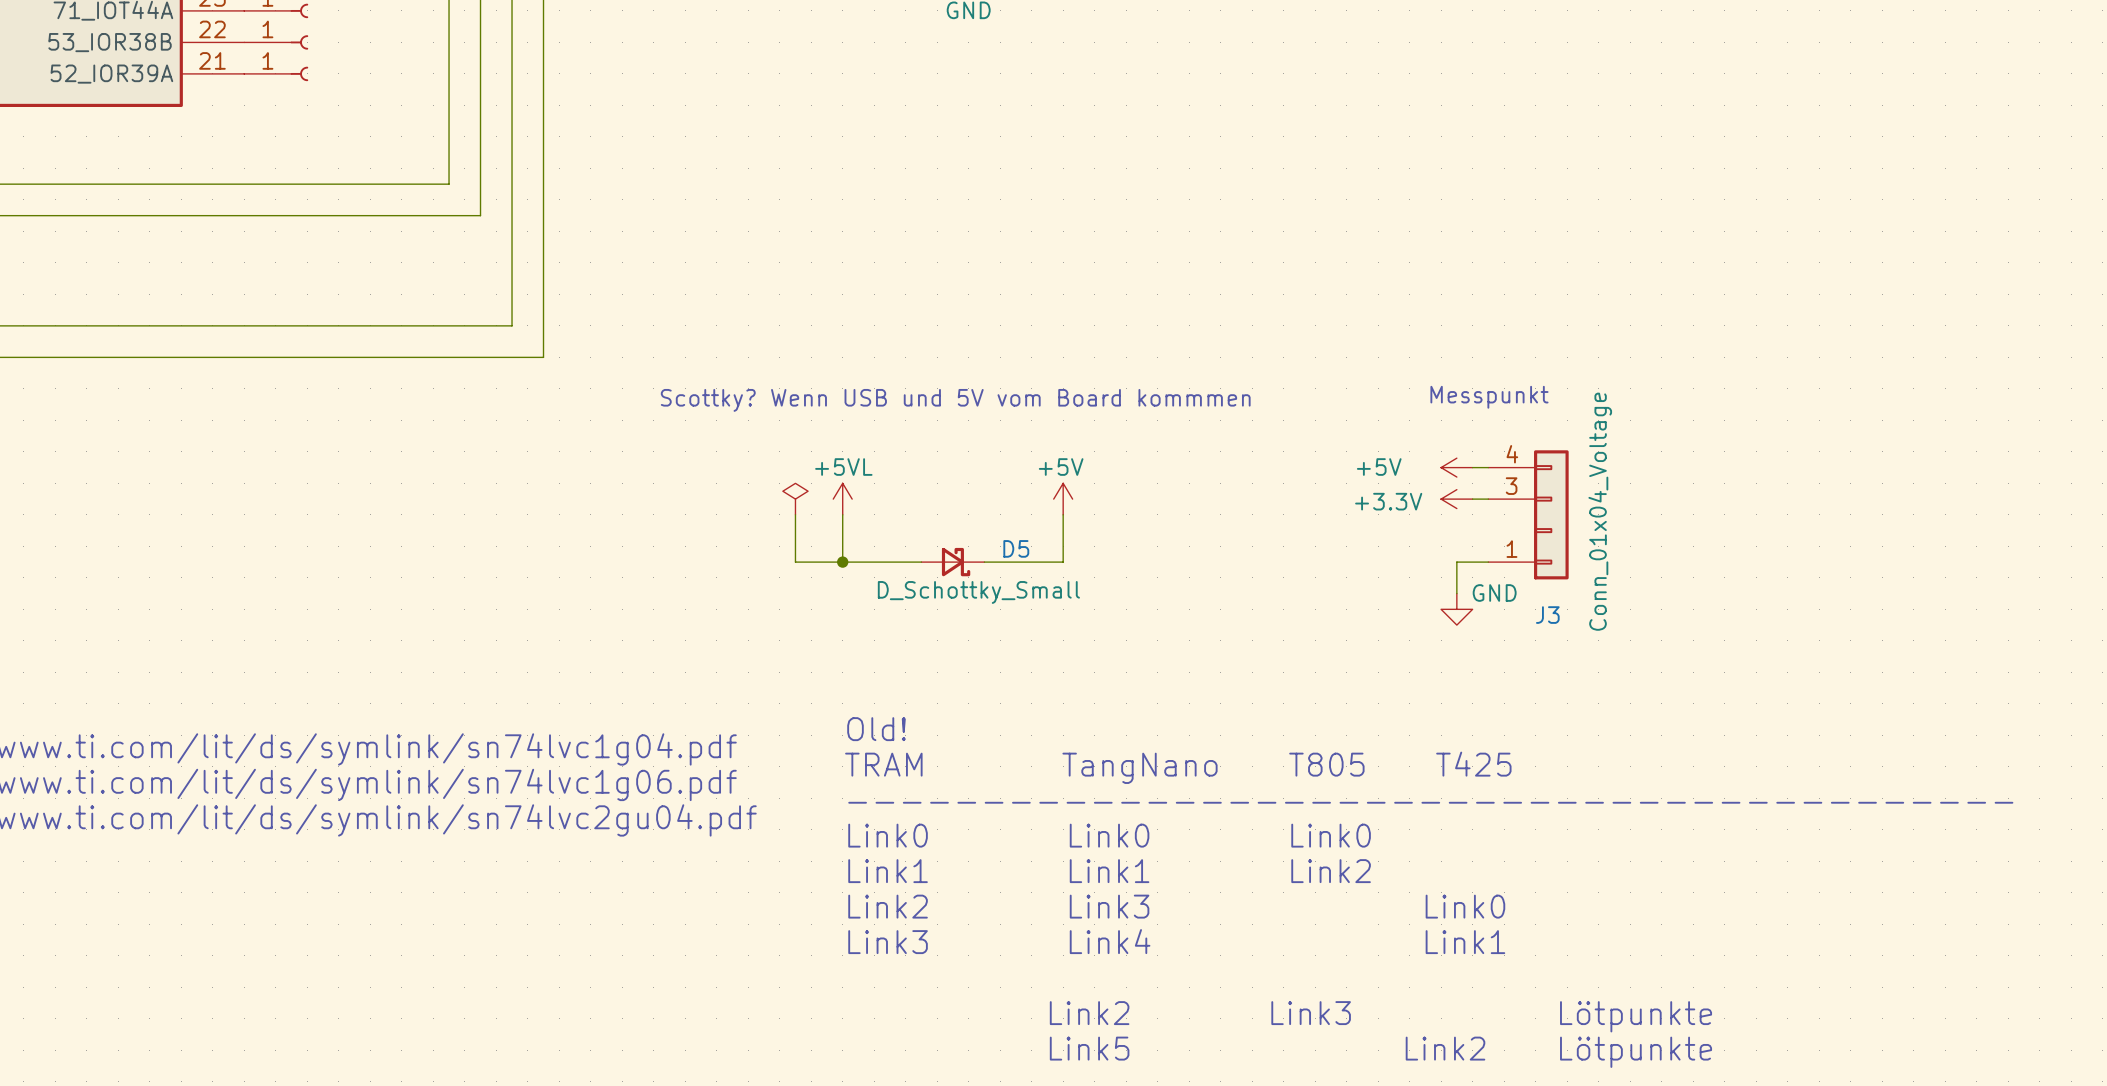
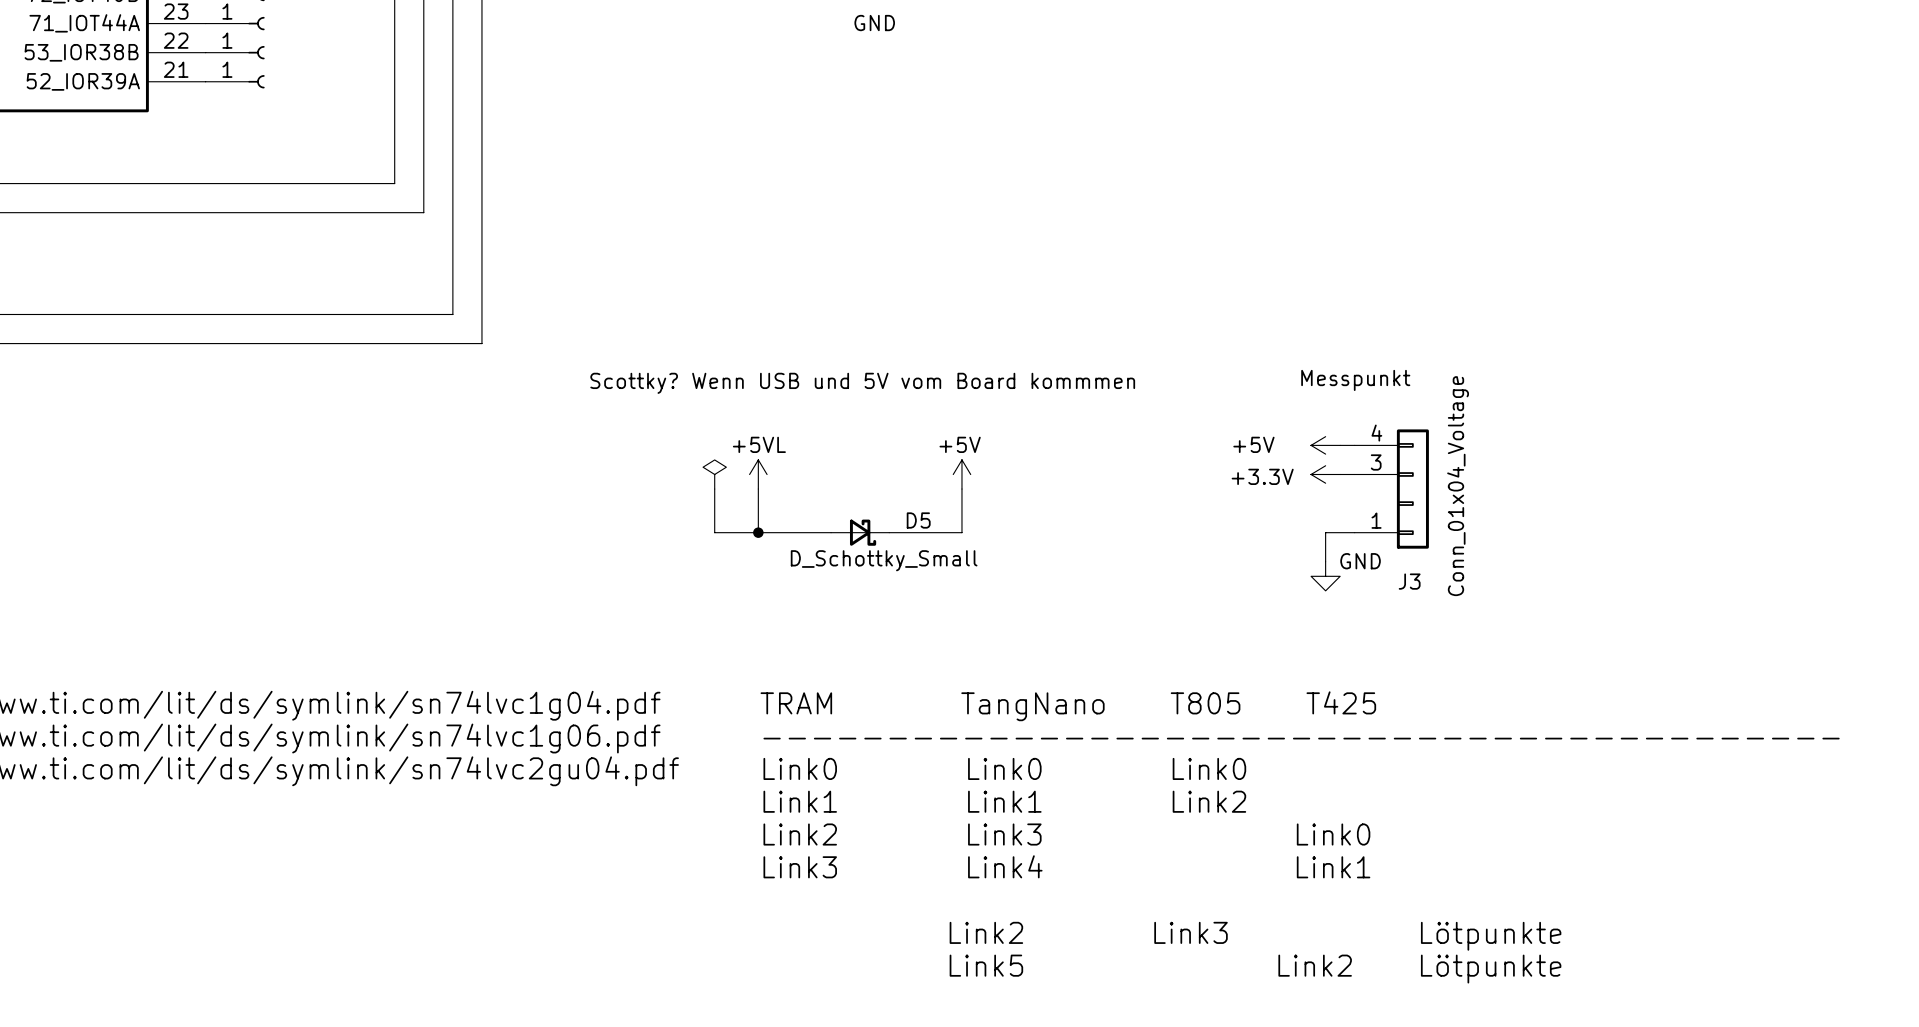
text: Old! (876, 729) -> none
text position: TRAM TangNano T805 T425 (1178, 767) -> TRAM TangNano T805 T425 (1068, 706)
text position: ------------------------------------------- (1430, 802) -> ------------------------------------------- (1301, 738)
text position: Link0 Link0 Link0 (1109, 835) -> Link0 Link0 Link0 (1004, 768)
text position: Link1 Link1 Link2 (1109, 871) -> Link1 Link1 Link2 (1004, 801)
text position: Link2 Link3 Link0 (1176, 906) -> Link2 Link3 Link0 (1066, 834)
text position: Link3 Link4 Link1 (1176, 941) -> Link3 Link4 Link1 (1066, 866)
text position: Link2 Link3 Lötpunkte (1380, 1016) -> Link2 Link3 Lötpunkte (1255, 936)
text position: Link5 Link2 Lötpunkte (1380, 1052) -> Link5 Link2 Lötpunkte (1255, 969)

